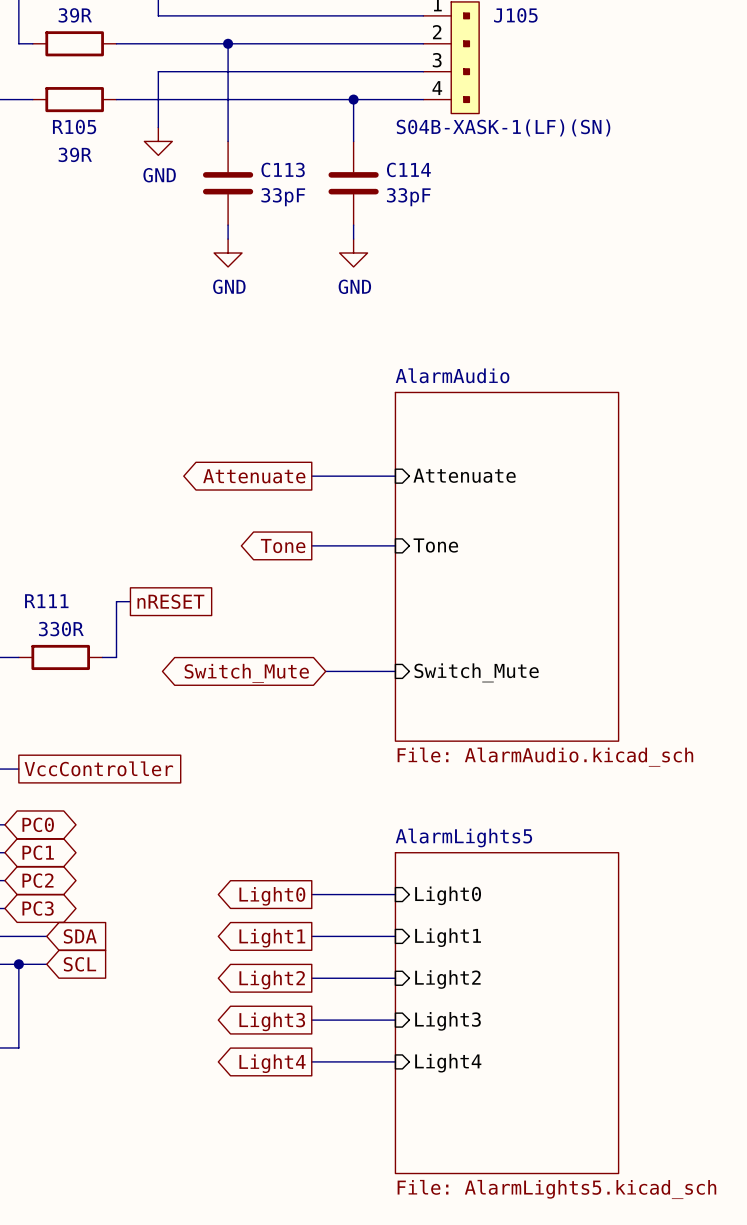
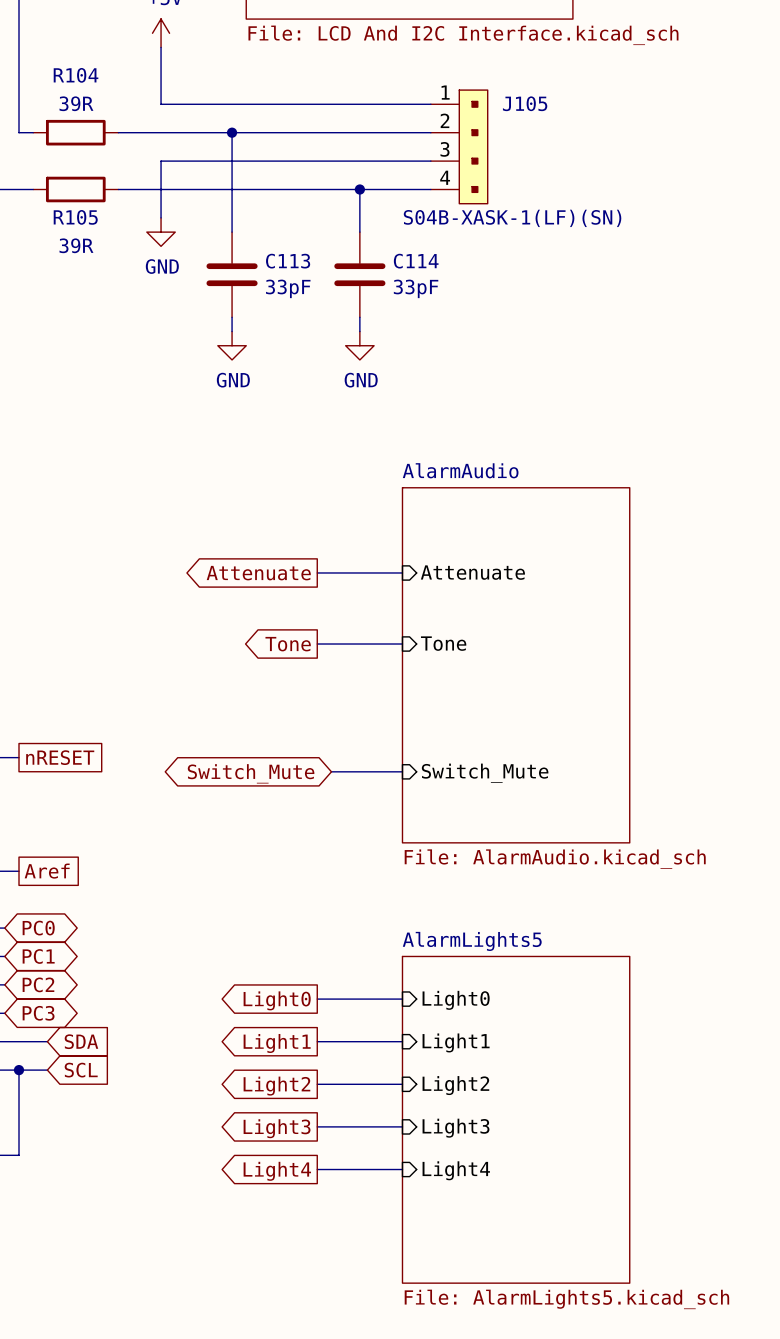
wire: (130, 601) (116, 601) (116, 657) (102, 657) -> none
global label position: nRESET (170, 601) -> nRESET (60, 757)
R111: 330R (60, 657) -> none
global label: VccController (98, 768) -> Aref (47, 871)

